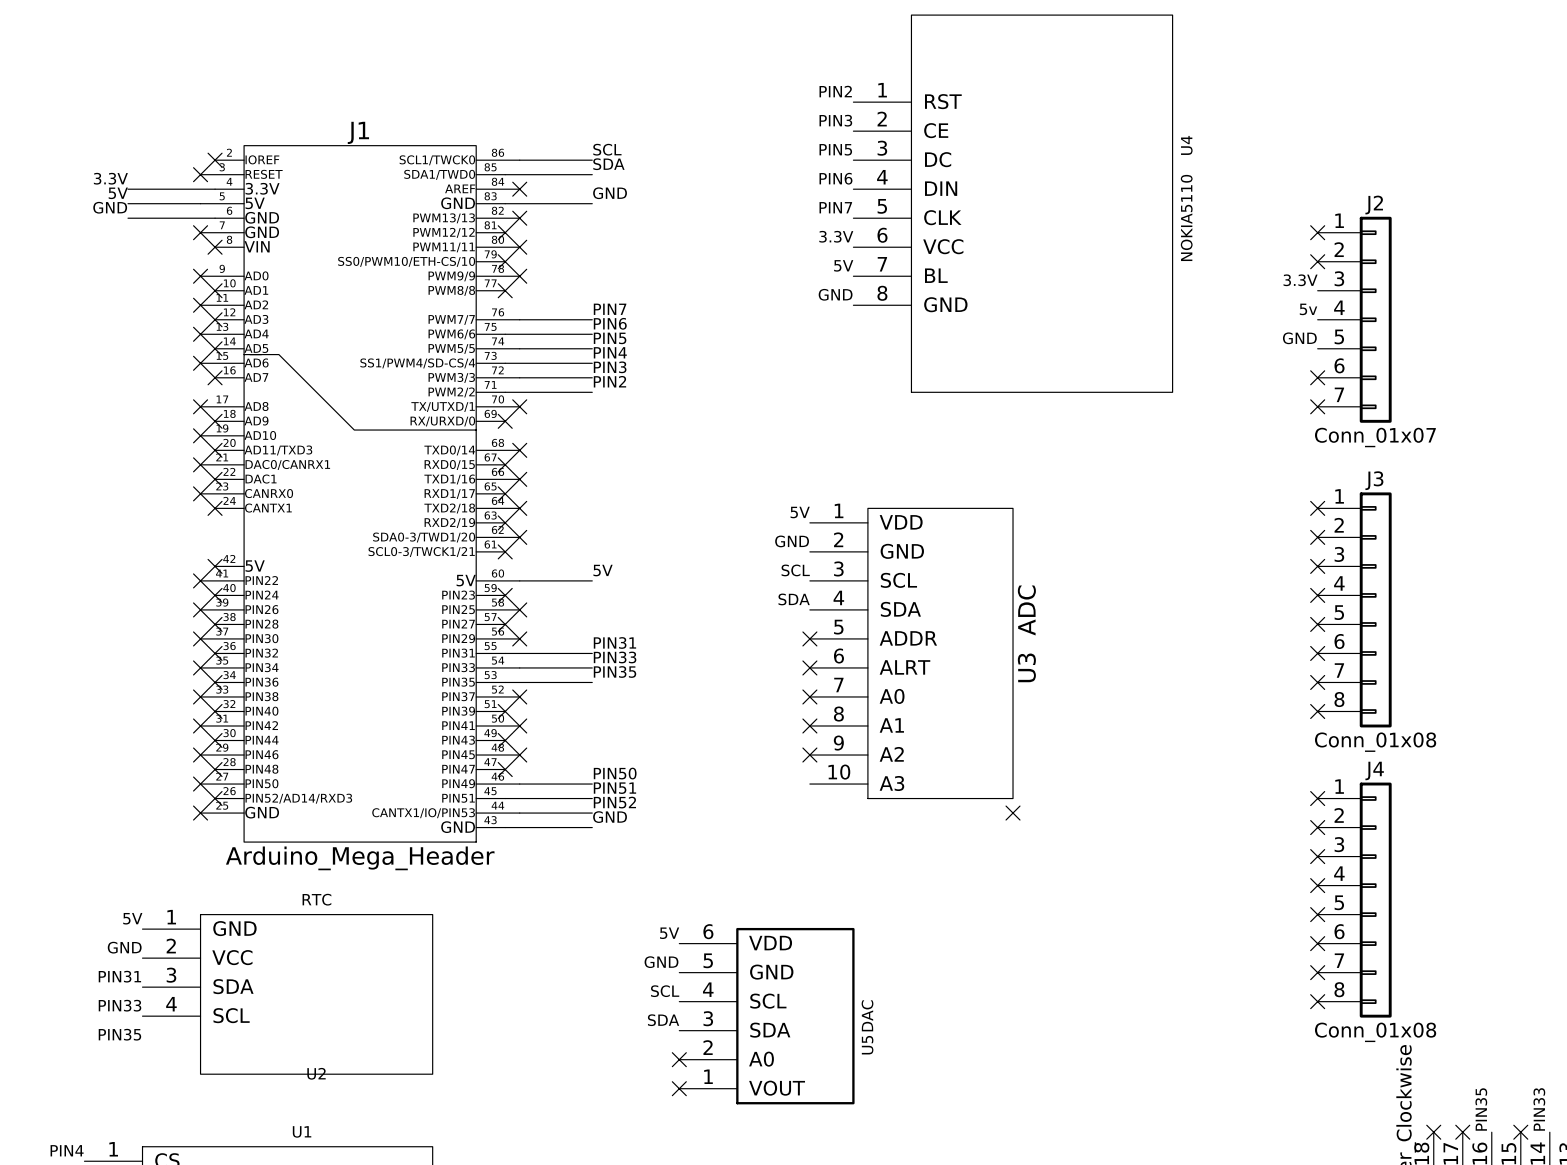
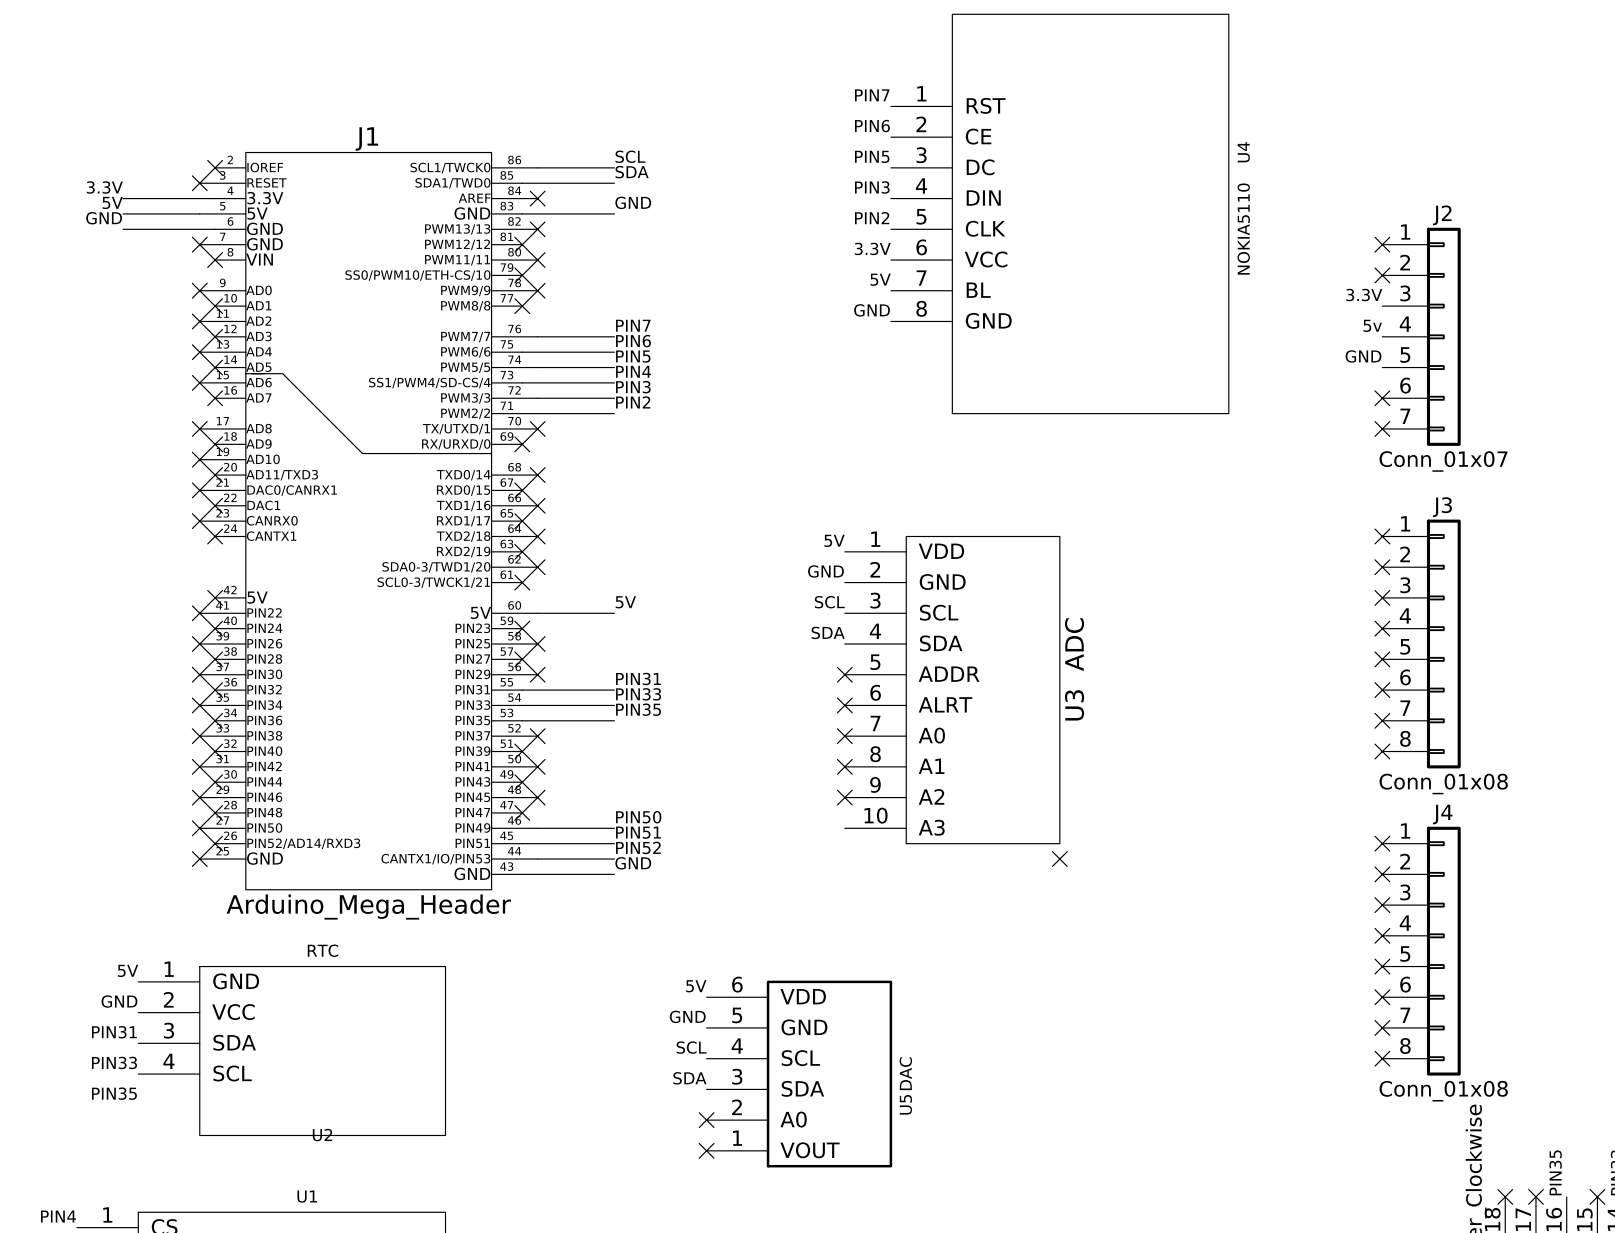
label: PIN2 (835, 91) -> PIN7 (872, 95)
label: PIN3 (835, 120) -> PIN6 (872, 126)
label: PIN6 (835, 178) -> PIN3 (872, 187)
label: PIN7 (835, 207) -> PIN2 (872, 218)

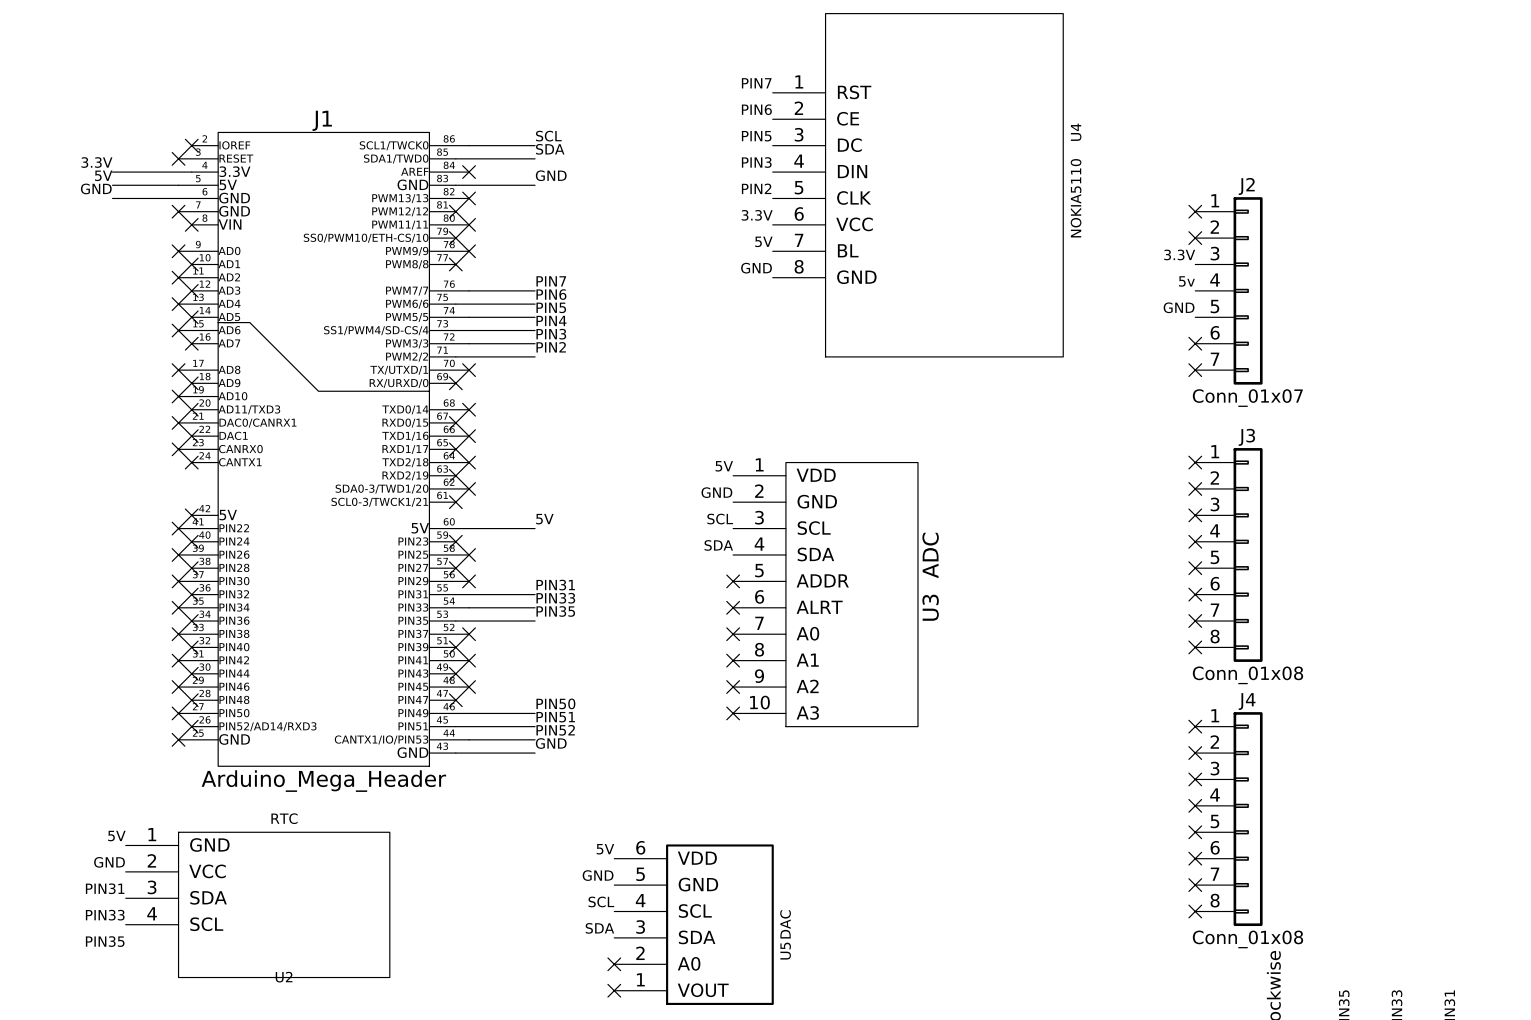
no-connect mark: none -> (733, 713)
no-connect mark: (1059, 859) -> none

